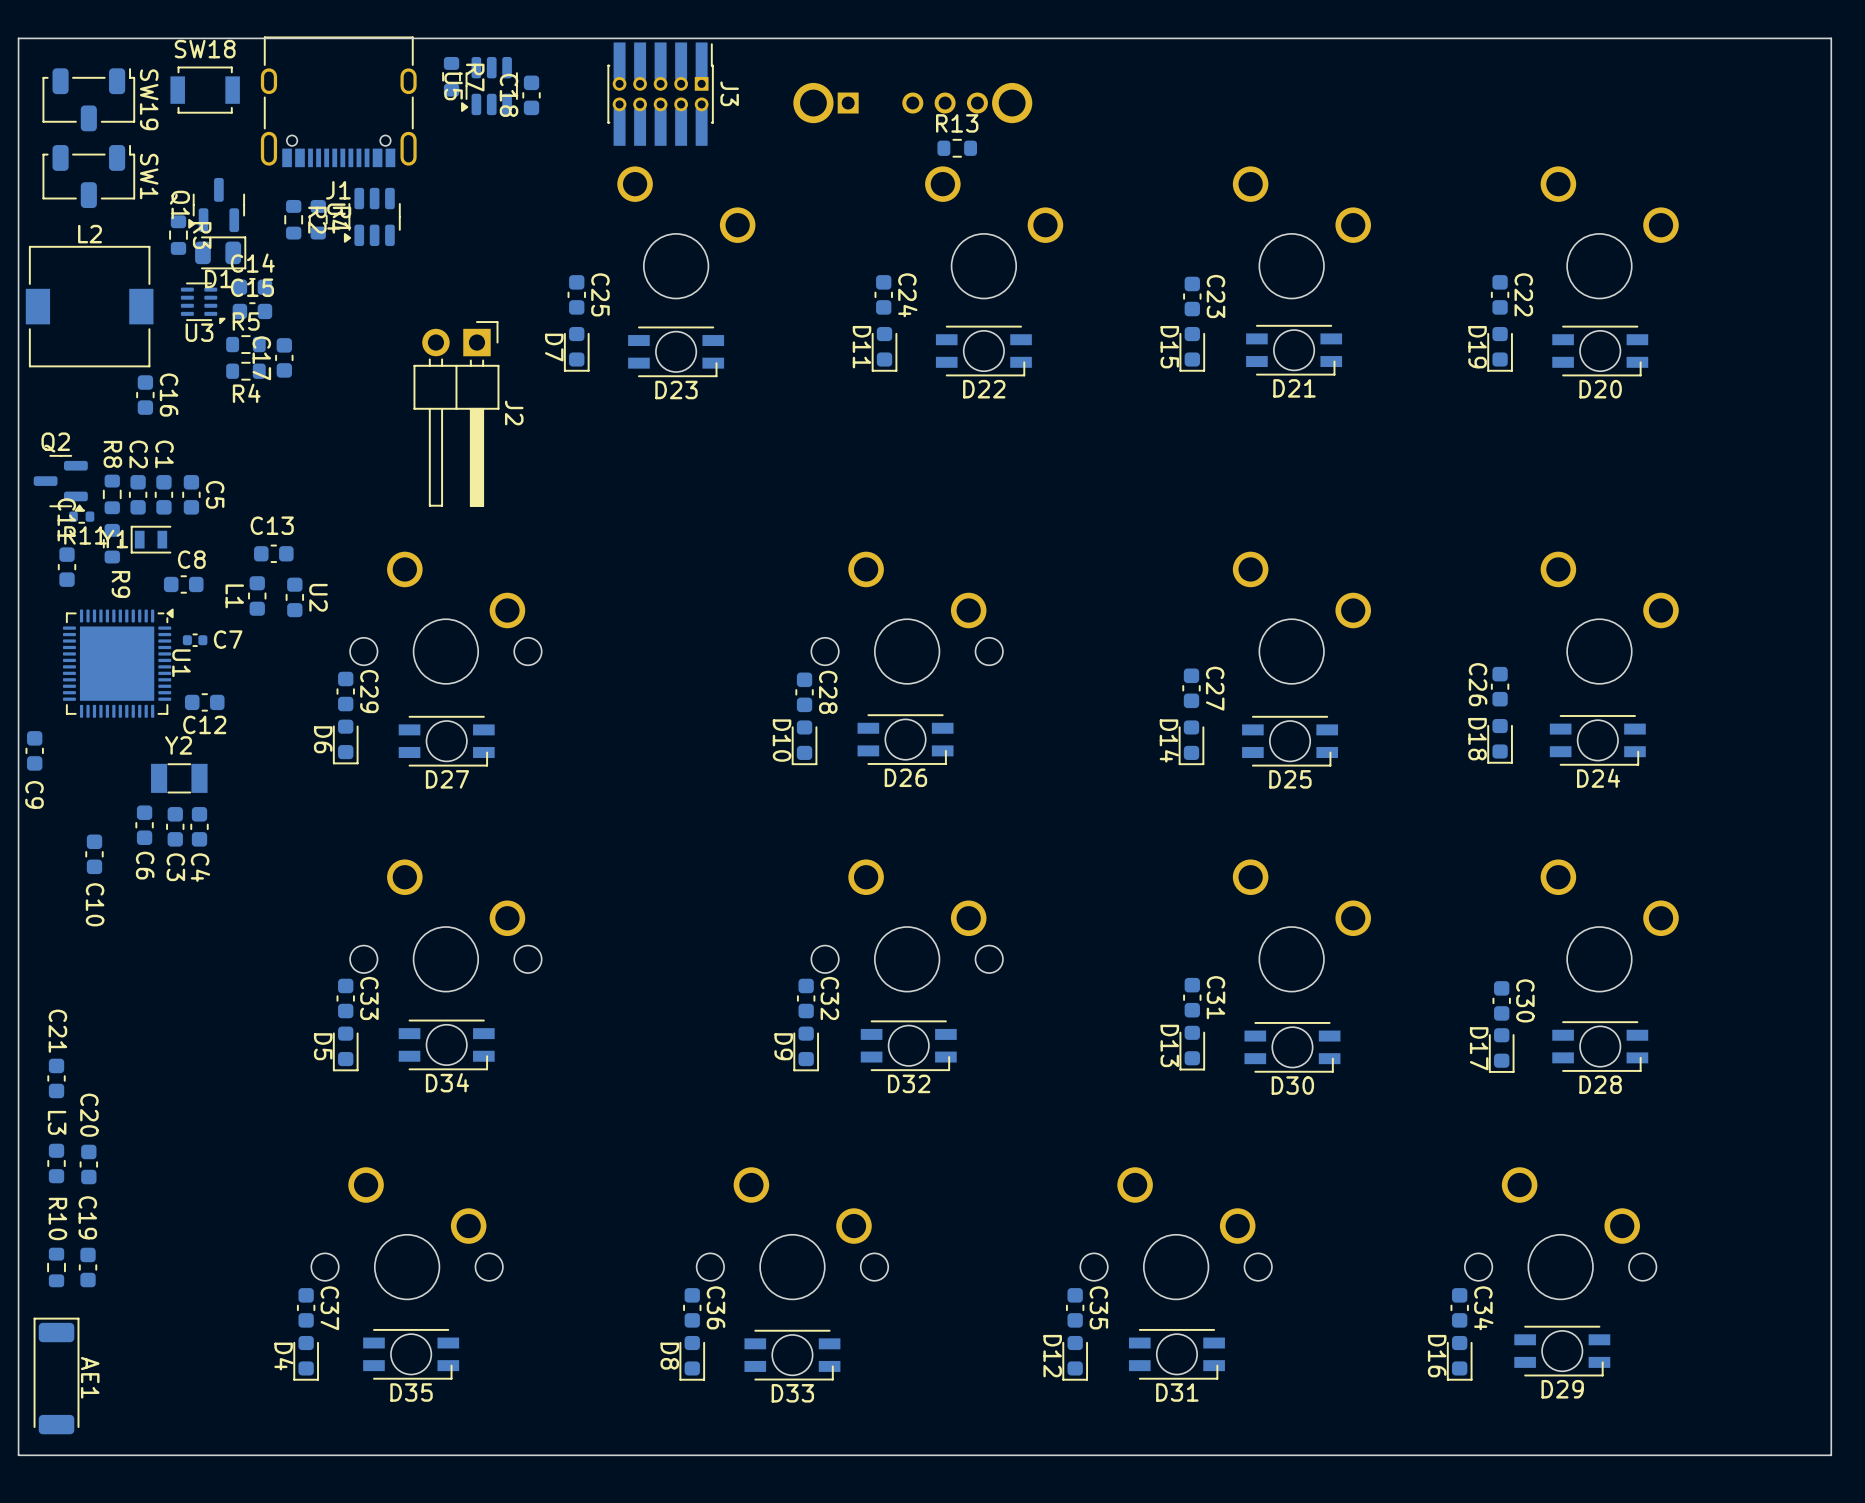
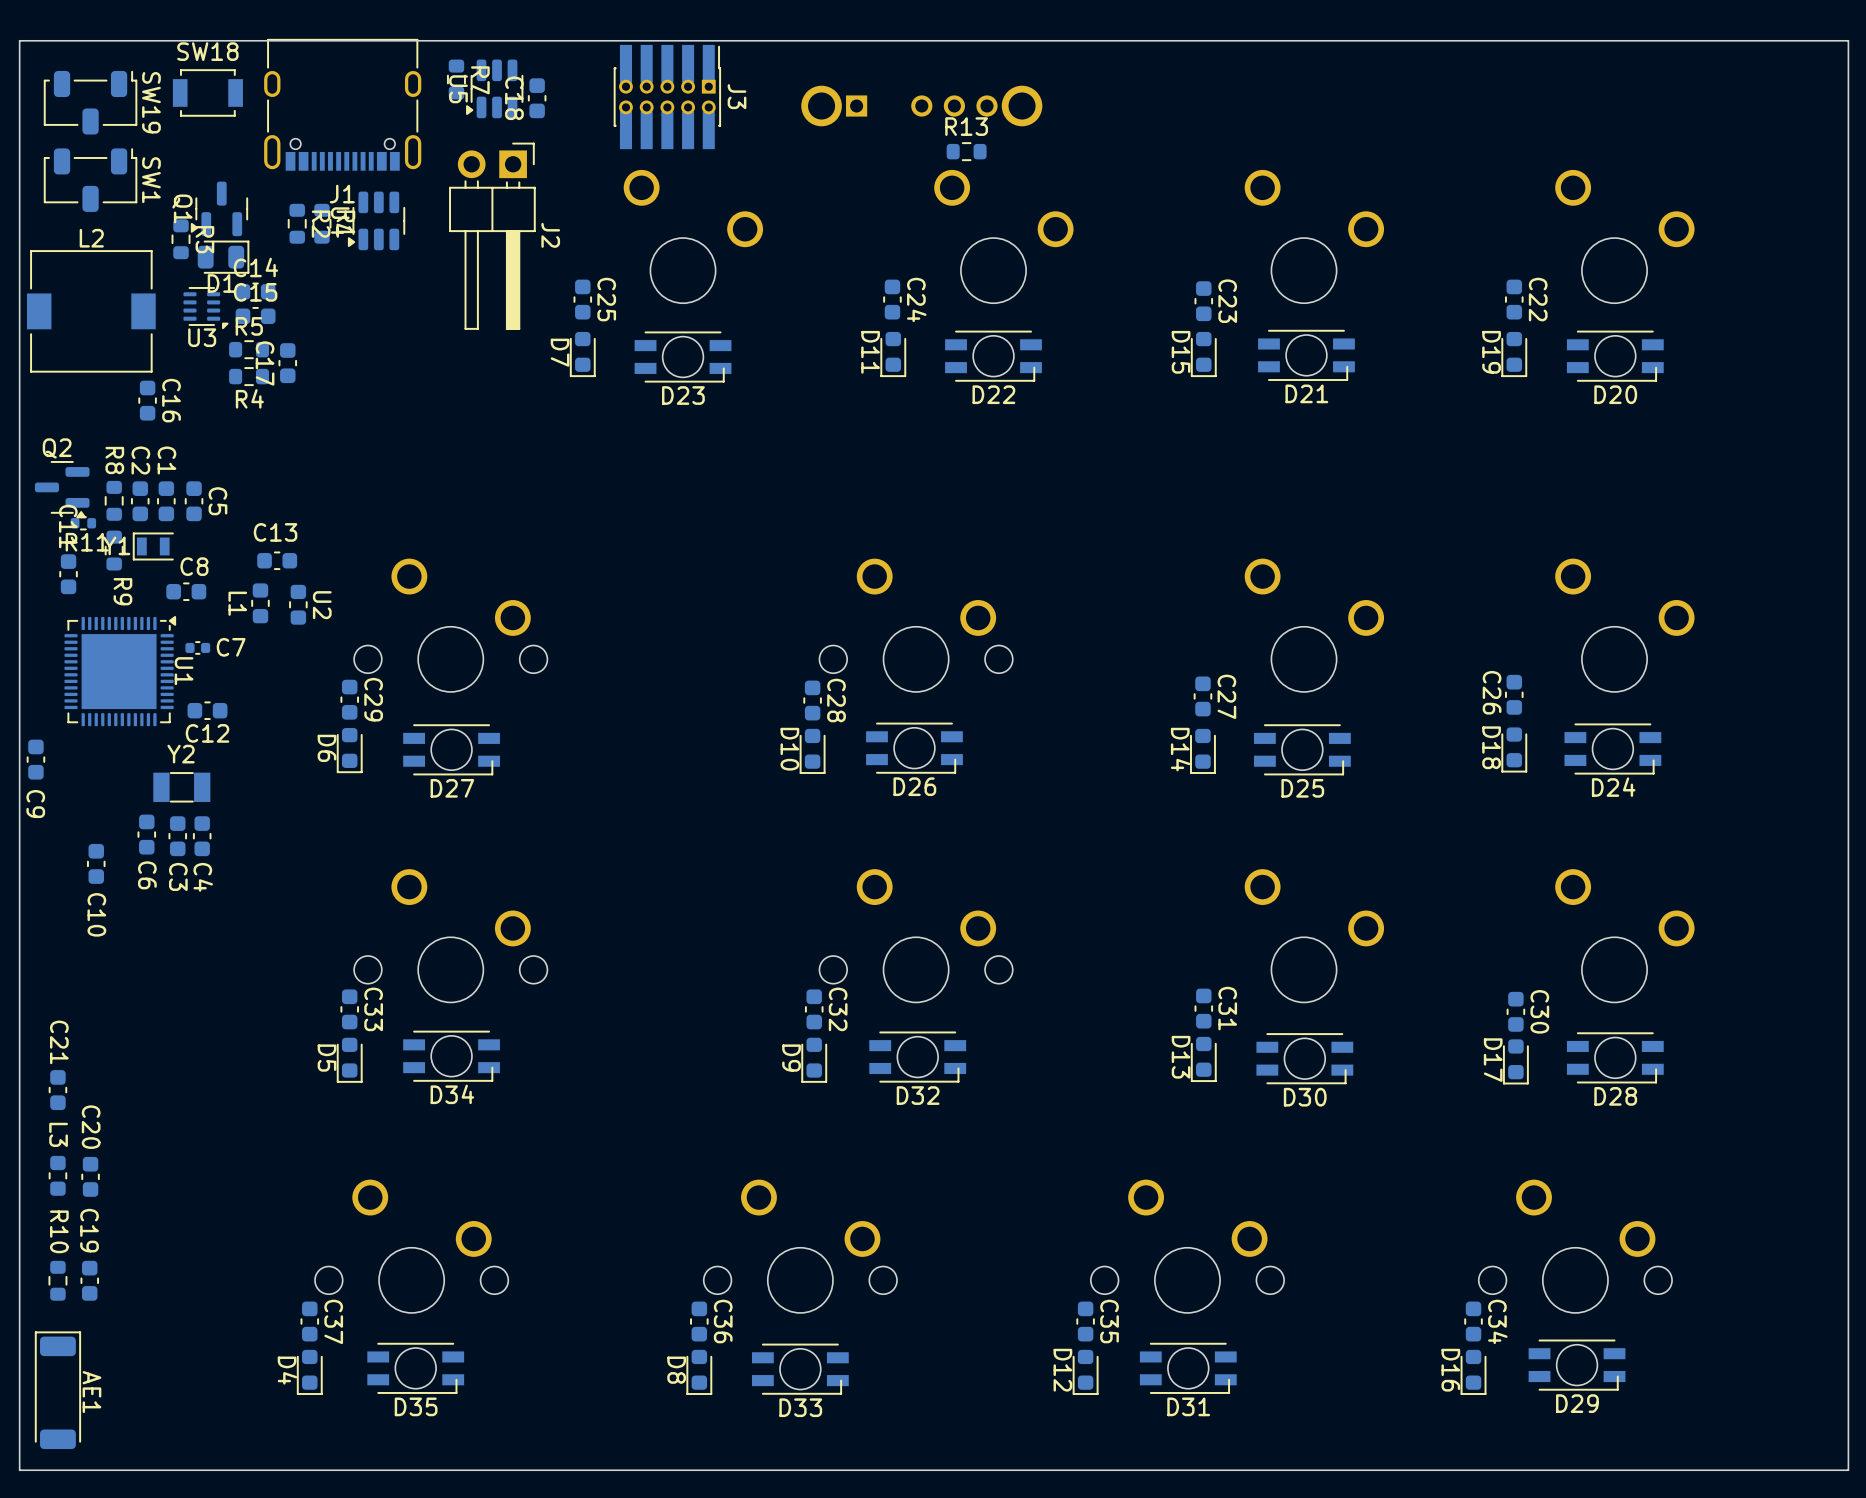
J2 position: (456, 413) -> (492, 236)

